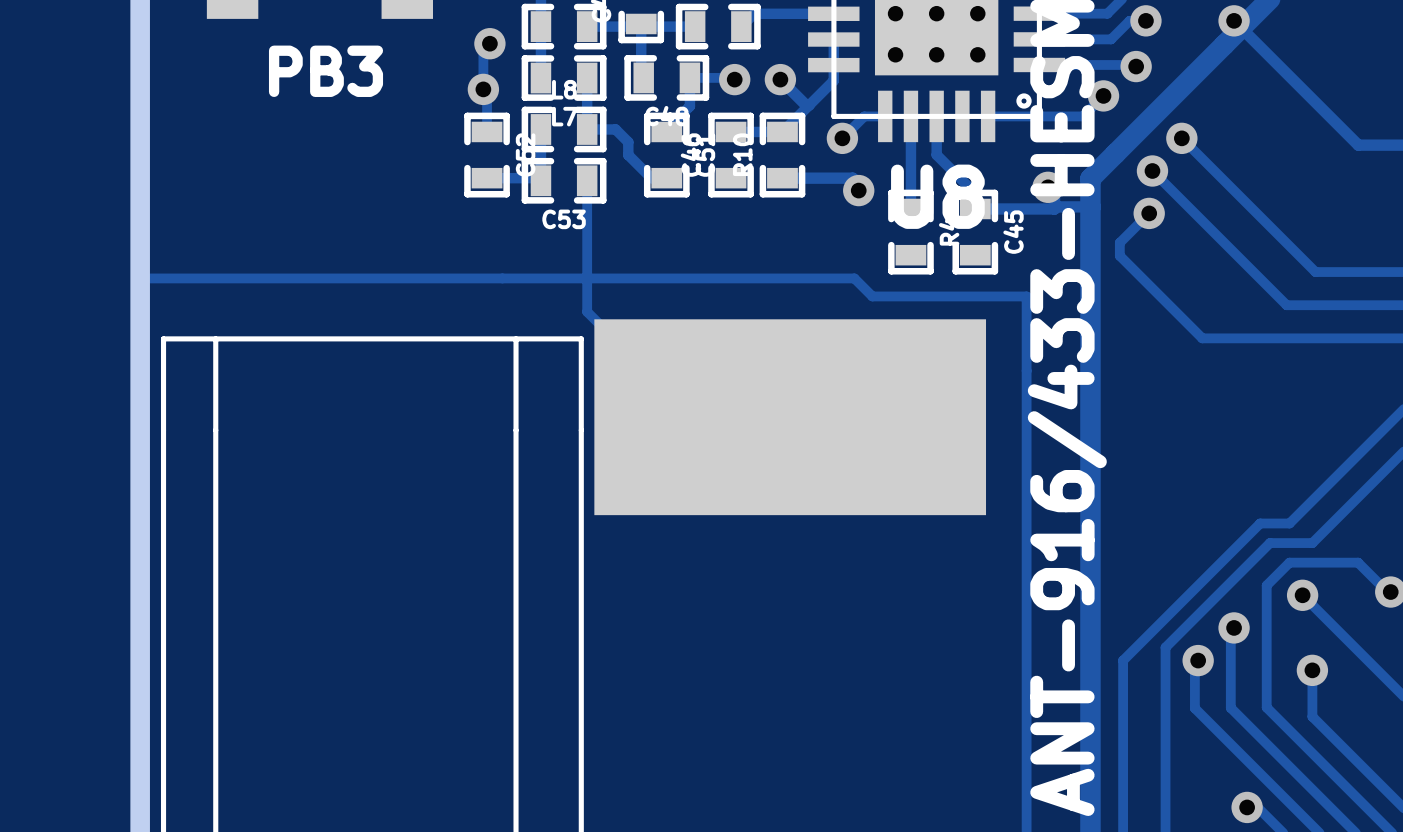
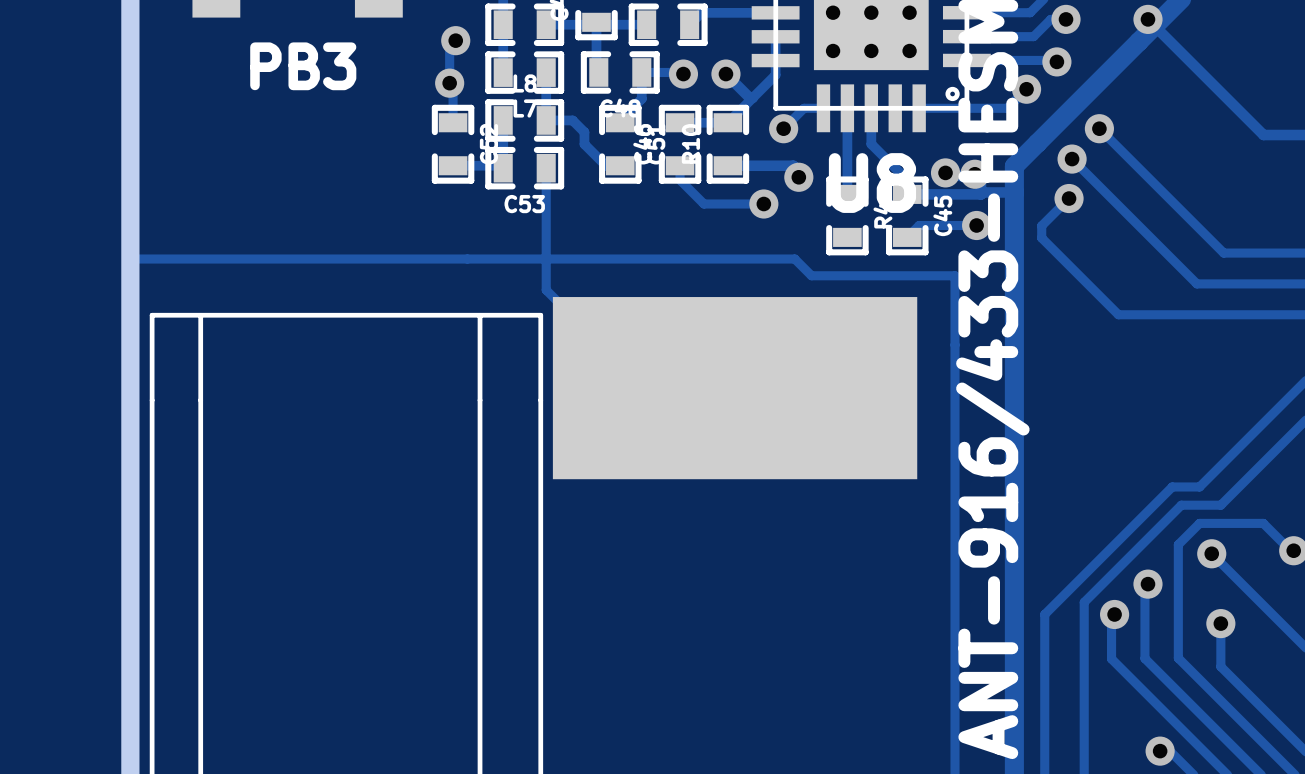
track: none -> (680, 165) (680, 180) (703, 204) (763, 204)
via: none -> (945, 172)
via: none -> (763, 204)
track: none -> (976, 225) (919, 225) (907, 237)
via: none -> (976, 225)

